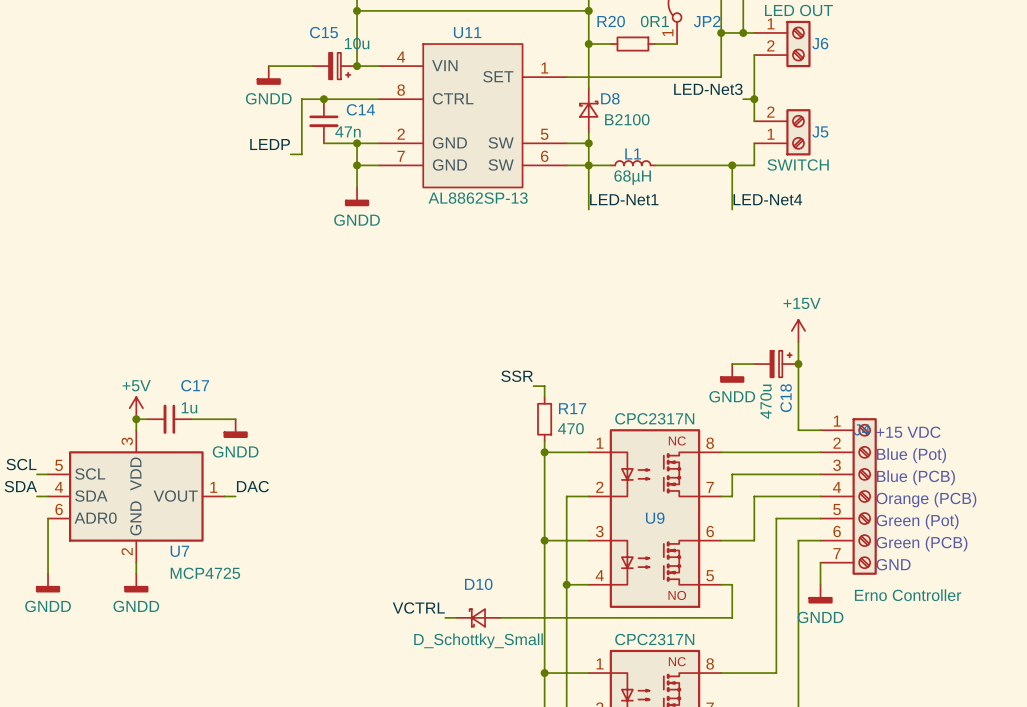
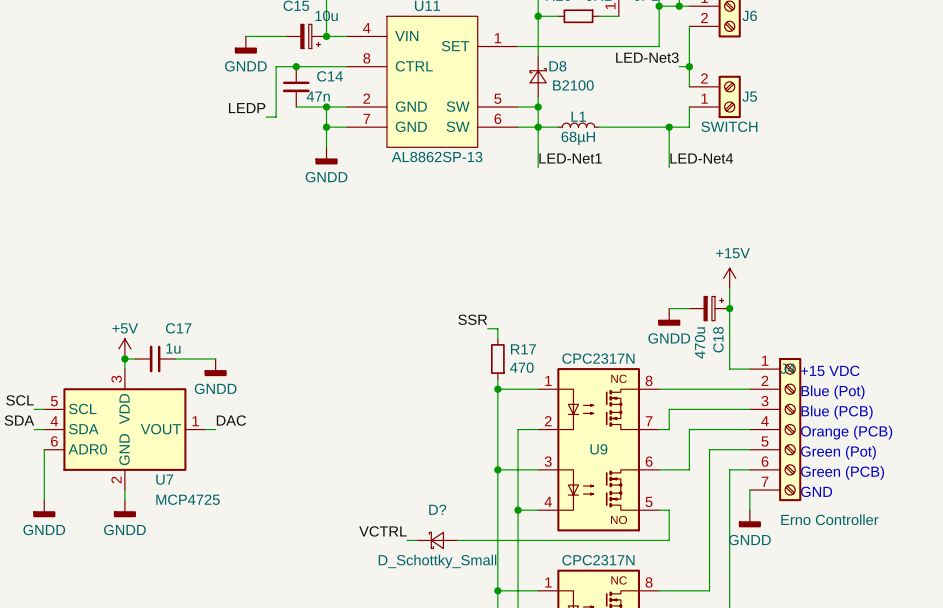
D10 name: D10 (478, 584) -> D? (437, 509)

